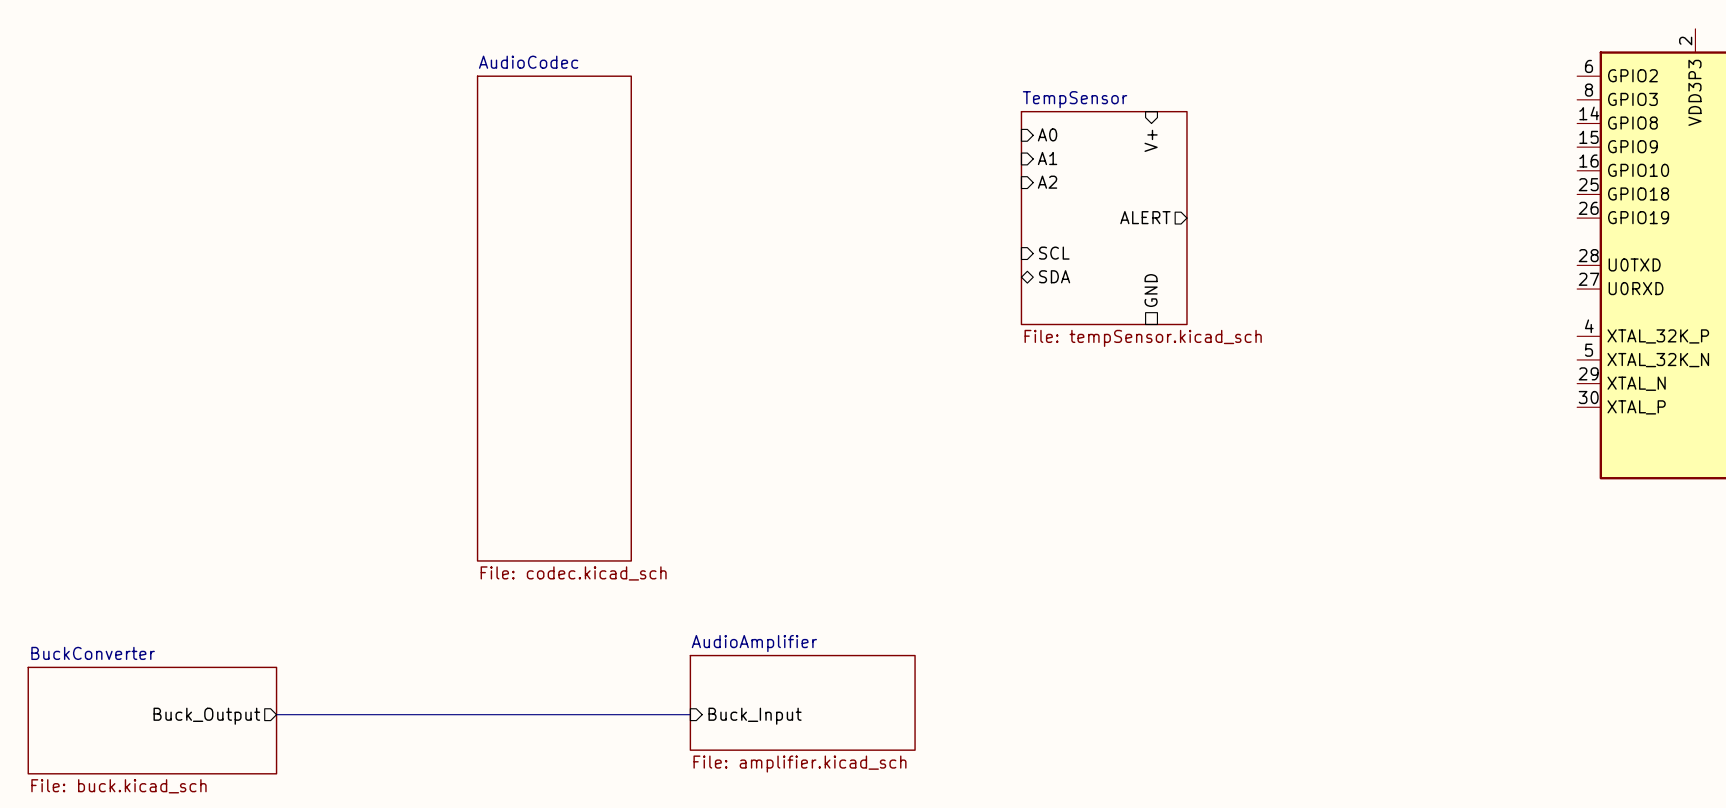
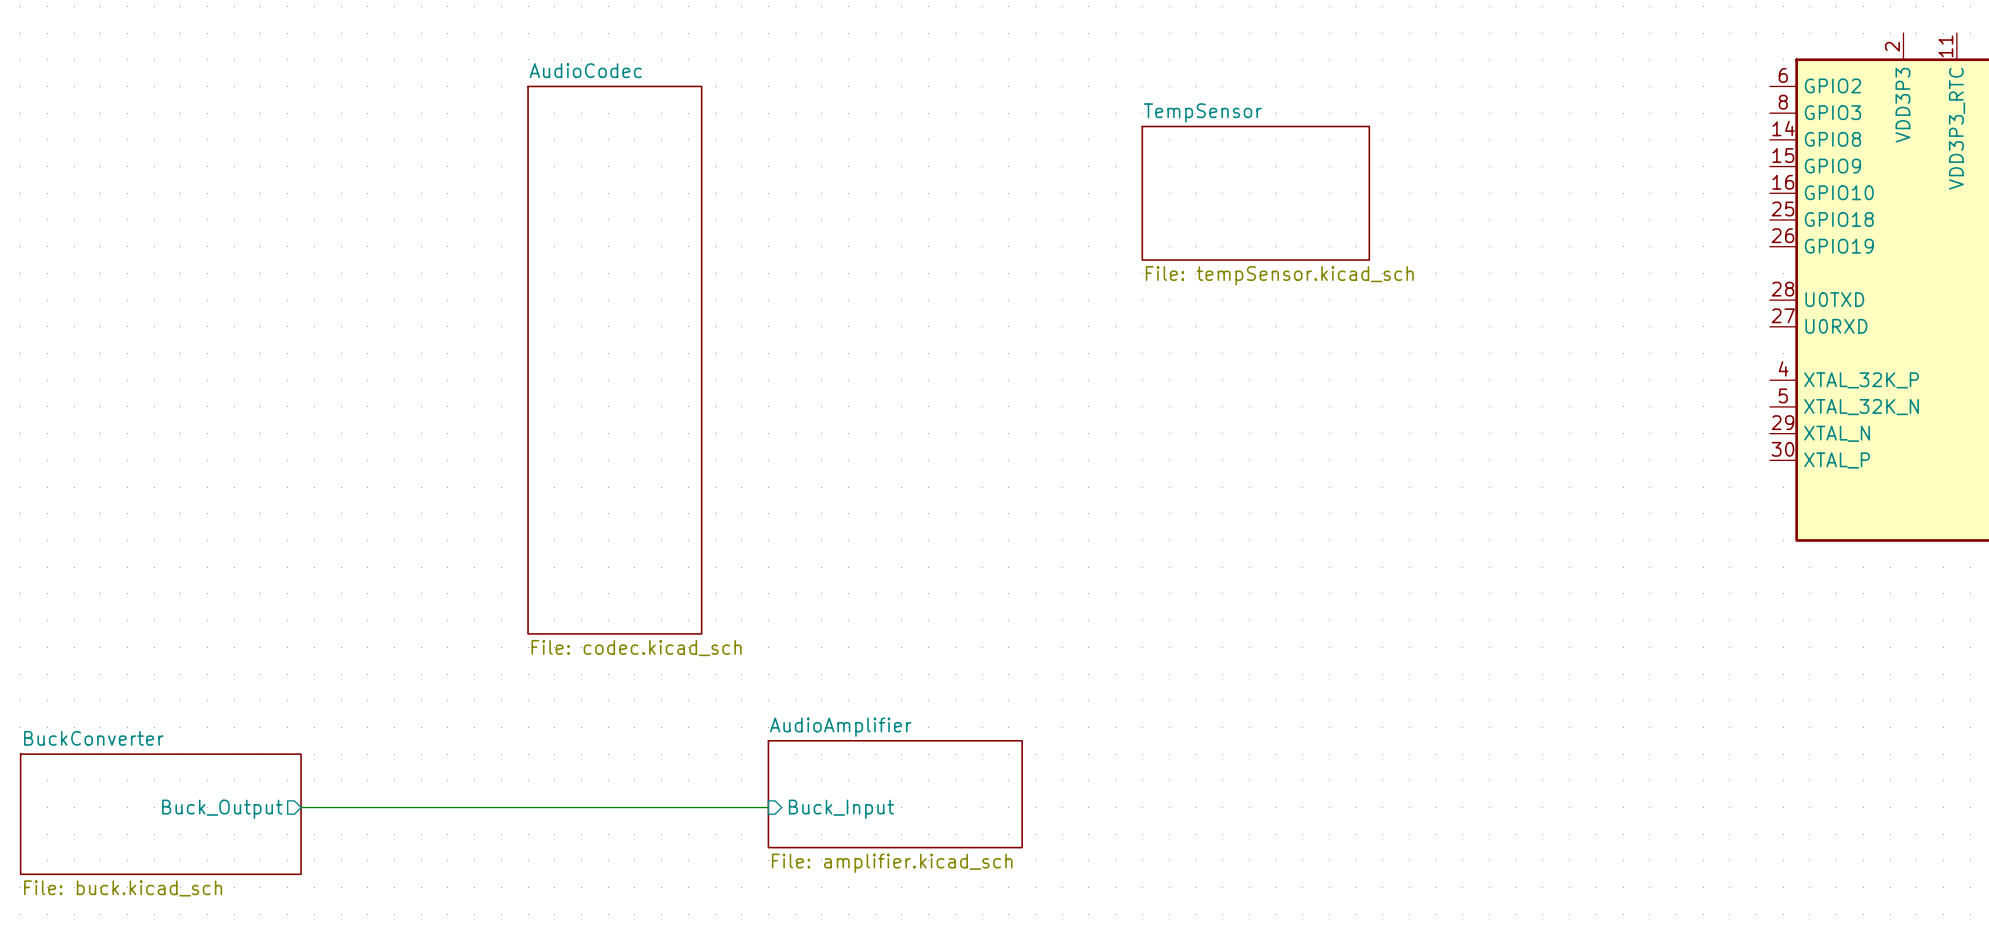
sheet pin: A0 (1047, 134) -> none
sheet pin: V+ (1151, 140) -> none
sheet pin: A1 (1047, 158) -> none
sheet TempSensor: none -> File: tempSensor.kicad_sch (1255, 193)
sheet pin: A2 (1047, 182) -> none
sheet pin: ALERT (1145, 217) -> none
sheet TempSensor: File: tempSensor.kicad_sch (1104, 218) -> none
sheet pin: SCL (1054, 253) -> none
sheet pin: SDA (1054, 276) -> none
sheet pin: GND (1151, 290) -> none

